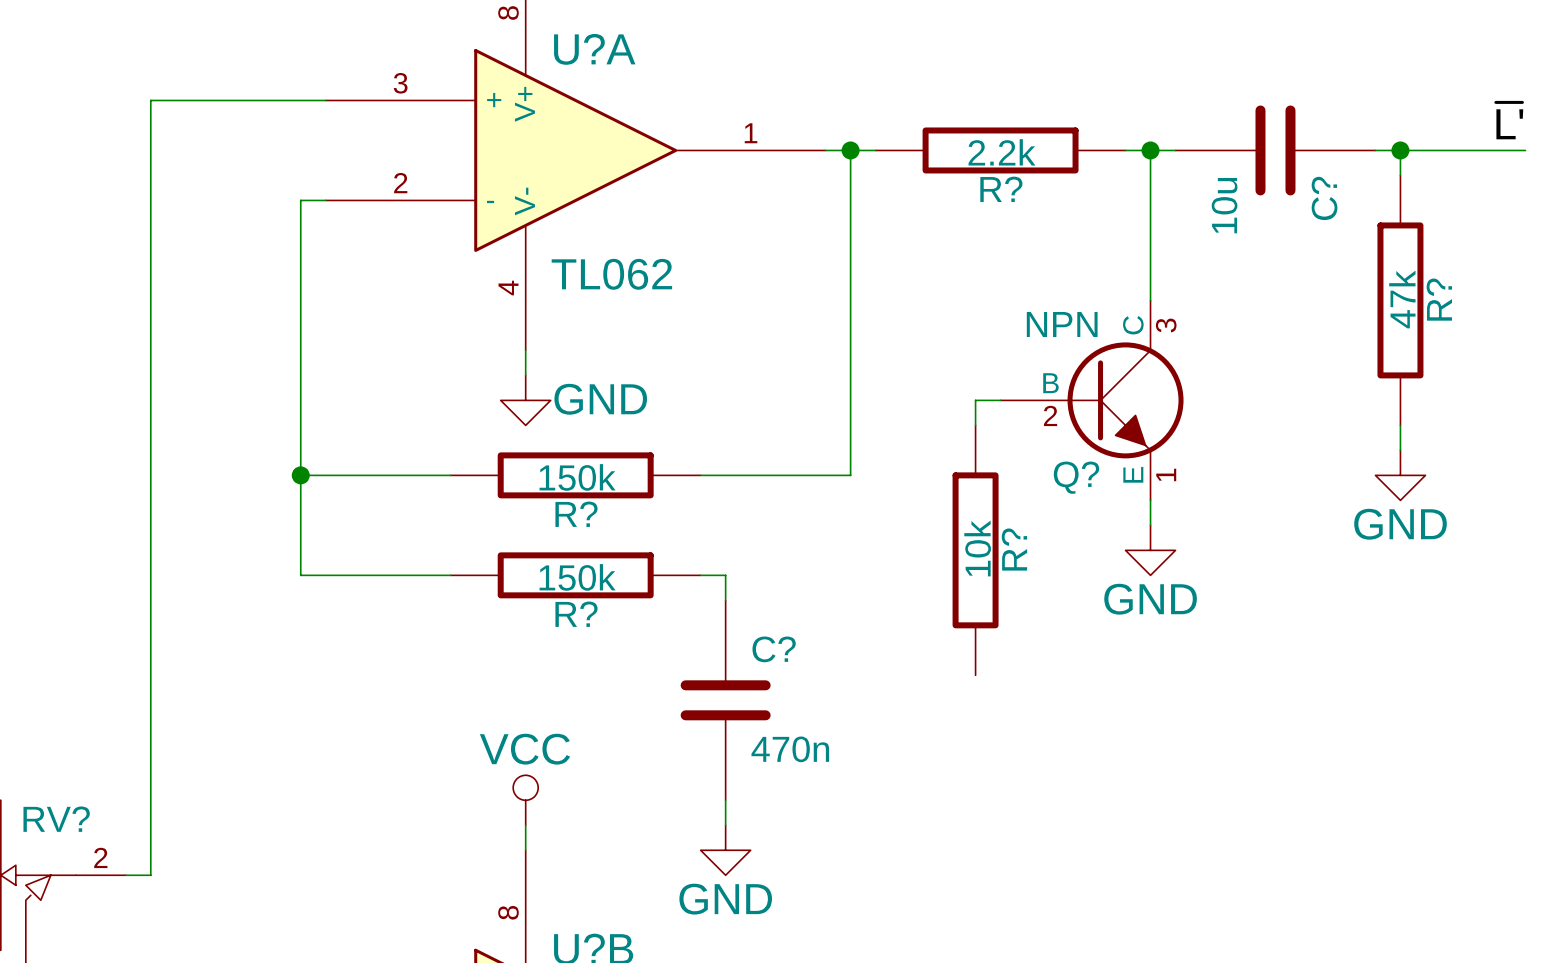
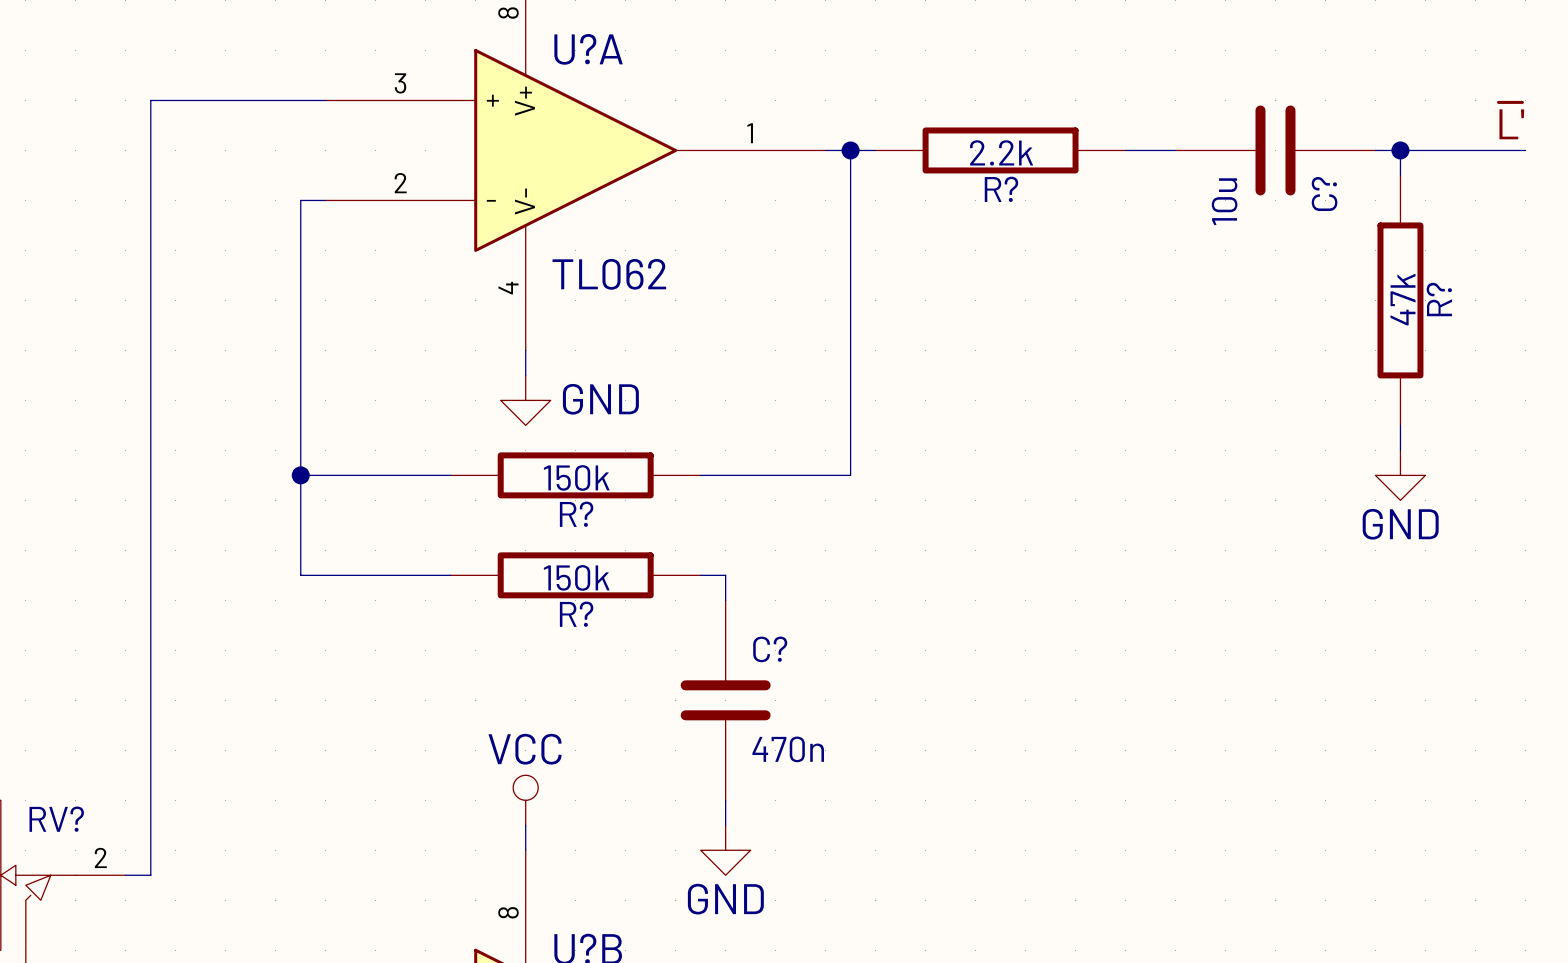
wire: (1150, 150) (1150, 300) -> none
junction: (1150, 150) -> none
wire: (1000, 400) (975, 400) (975, 425) -> none
Q?: NPN (1092, 400) -> none
wire: (1150, 500) (1150, 525) -> none
R?: 10k (975, 550) -> none
power symbol: GND (1150, 550) -> none

